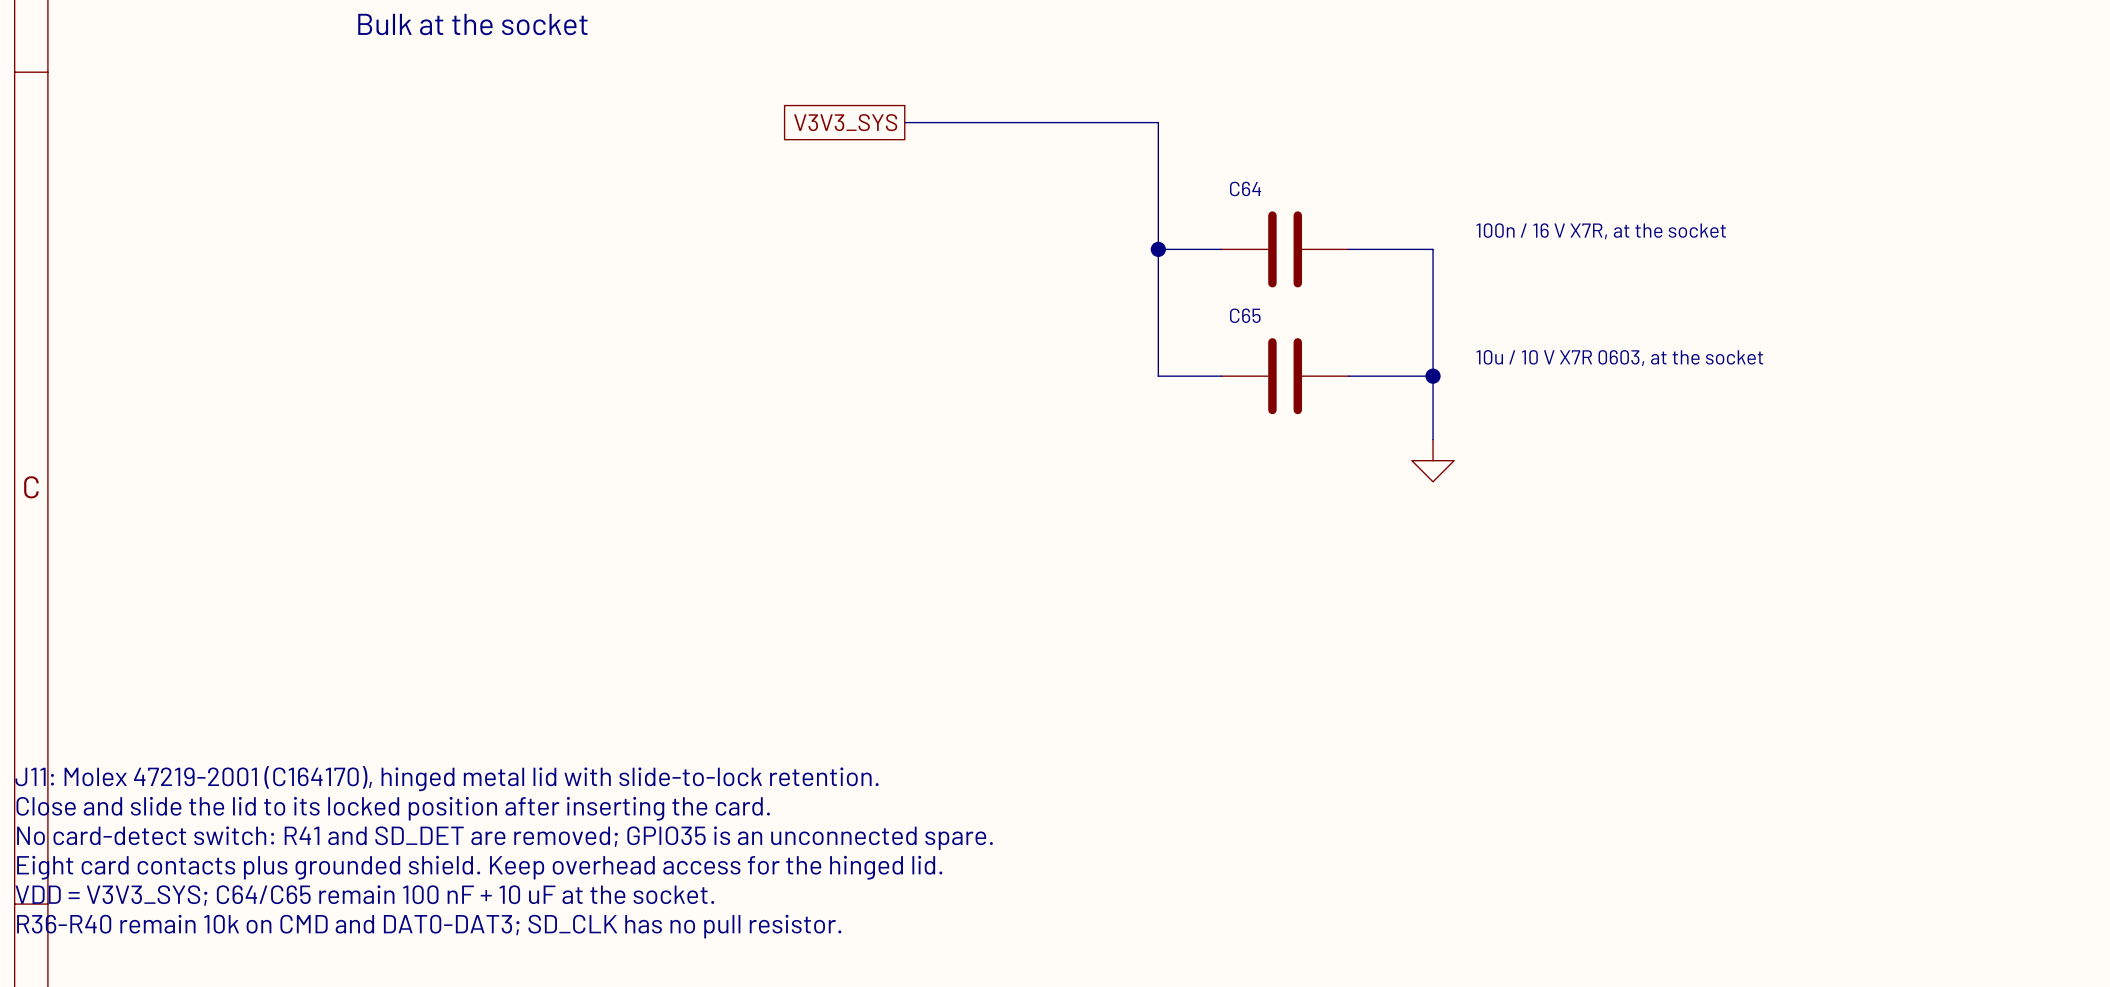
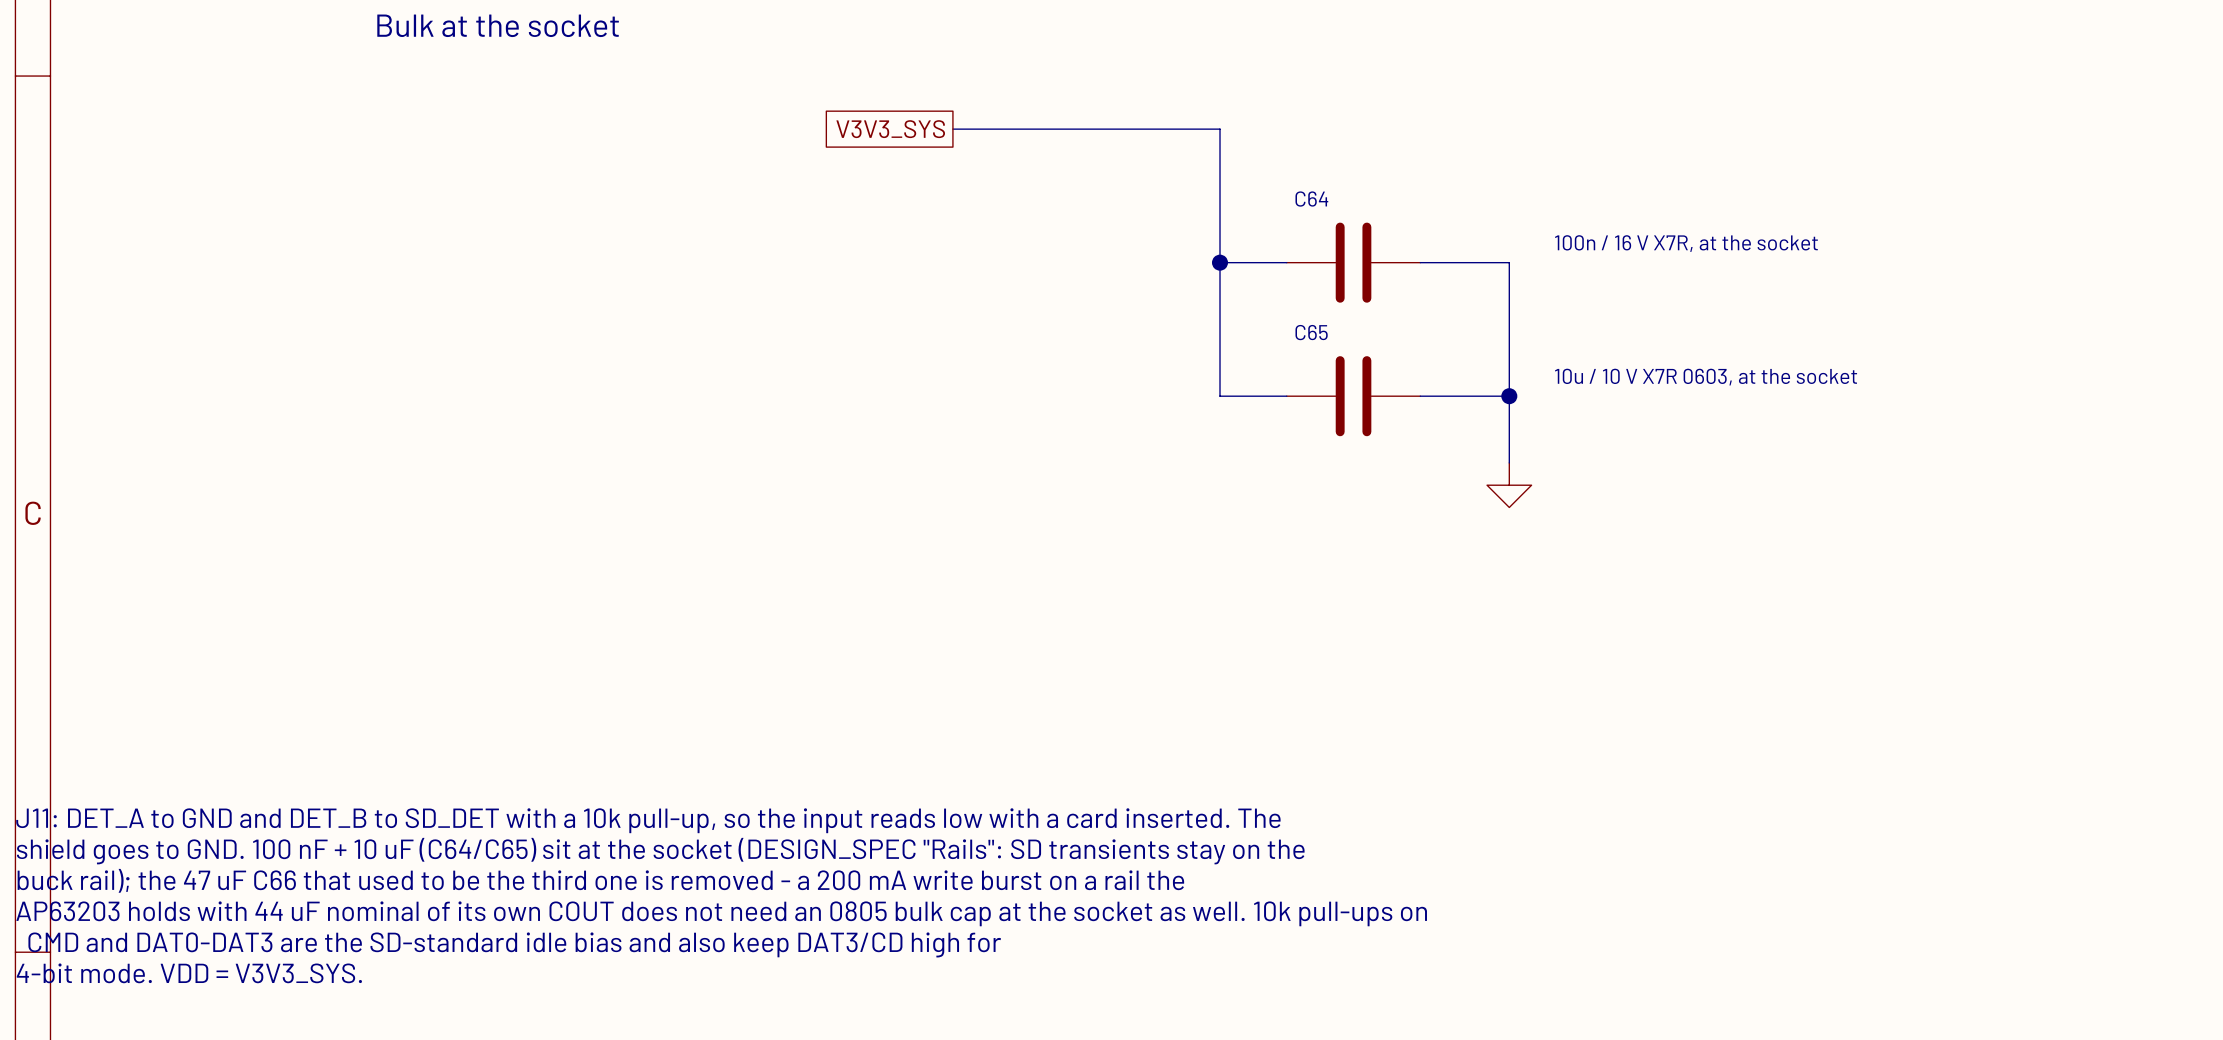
text: J11: Molex 47219-2001 (C164170), hinged metal lid with slide-to-lock retention. (446, 778) -> J11: DET_A to GND and DET_B to SD_DET with a 10k pull-up, so the input reads low with a card inserted. The (648, 820)
text: Close and slide the lid to its locked position after inserting the card. (393, 808) -> shield goes to GND. 100 nF + 10 uF (C64/C65) sit at the socket (DESIGN_SPEC "Rails": SD transients stay on the (660, 851)
text: No card-detect switch: R41 and SD_DET are removed; GPIO35 is an unconnected spare. (504, 838) -> buck rail); the 47 uF C66 that used to be the third one is removed - a 200 mA write burst on a rail the (600, 880)
text: Eight card contacts plus grounded shield. Keep overhead access for the hinged lid. (479, 867) -> AP63203 holds with 44 uF nominal of its own COUT does not need an 0805 bulk cap at the socket as well. 10k pull-ups on (721, 913)
text: VDD = V3V3_SYS; C64/C65 remain 100 nF + 10 uF at the socket. (364, 895) -> CMD and DAT0-DAT3 are the SD-standard idle bias and also keep DAT3/CD high for (514, 944)
text: R36-R40 remain 10k on CMD and DAT0-DAT3; SD_CLK has no pull resistor. (429, 926) -> 4-bit mode. VDD = V3V3_SYS. (189, 973)

